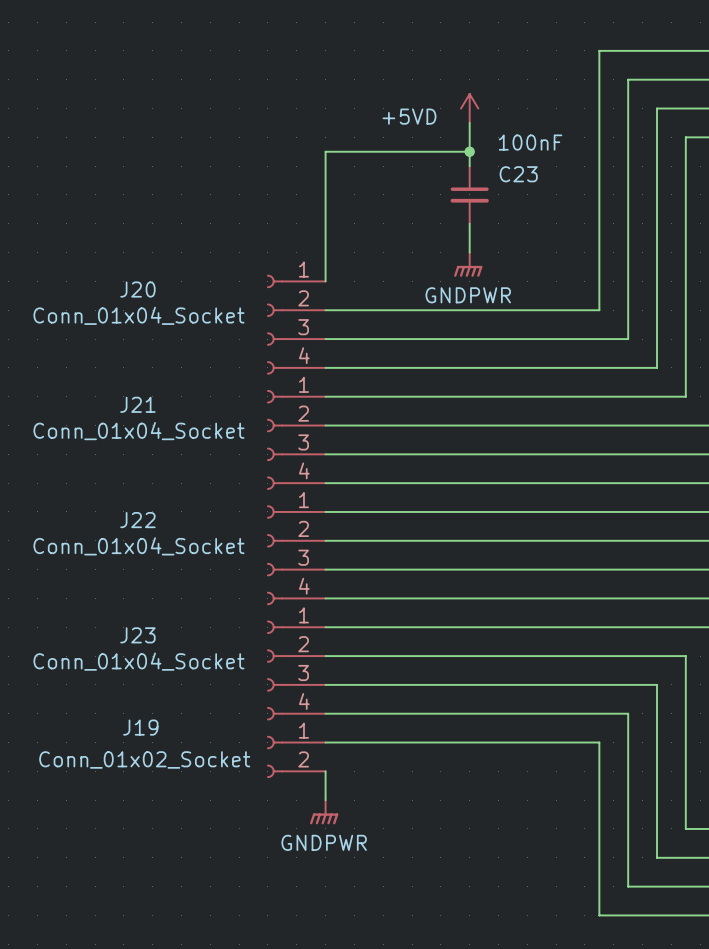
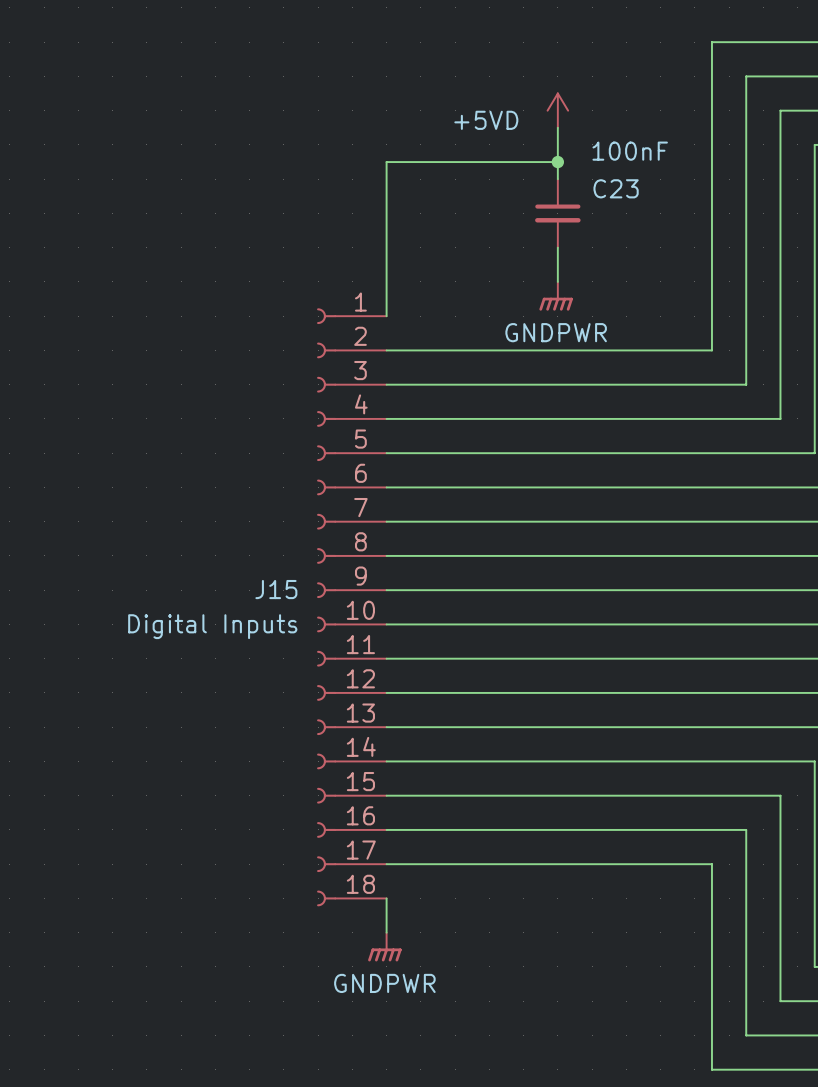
J20: Conn_01x04_Socket (296, 324) -> none
J21: Conn_01x04_Socket (296, 439) -> none
J15: none -> Digital Inputs (351, 607)
J22: Conn_01x04_Socket (296, 555) -> none
J23: Conn_01x04_Socket (296, 670) -> none
J19: Conn_01x02_Socket (296, 756) -> none

